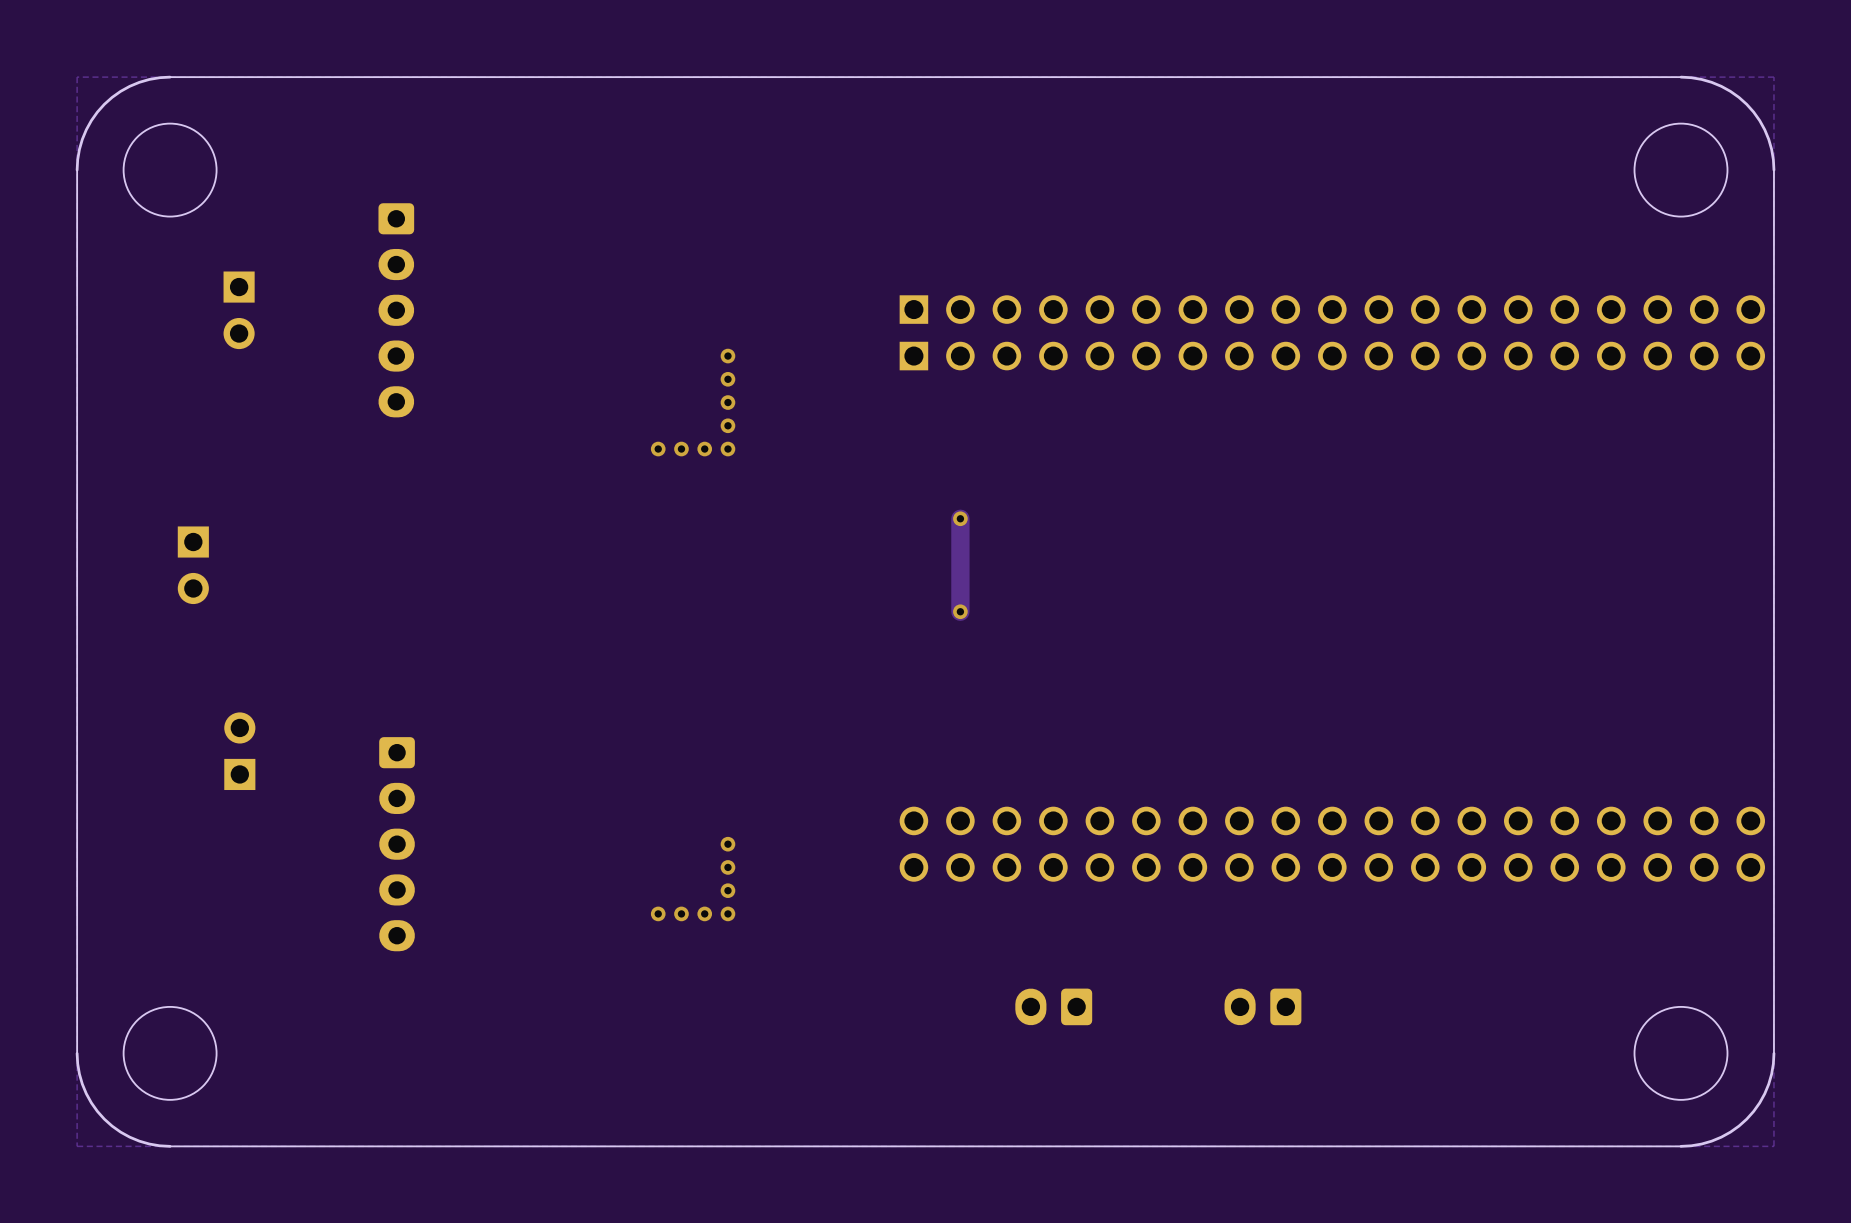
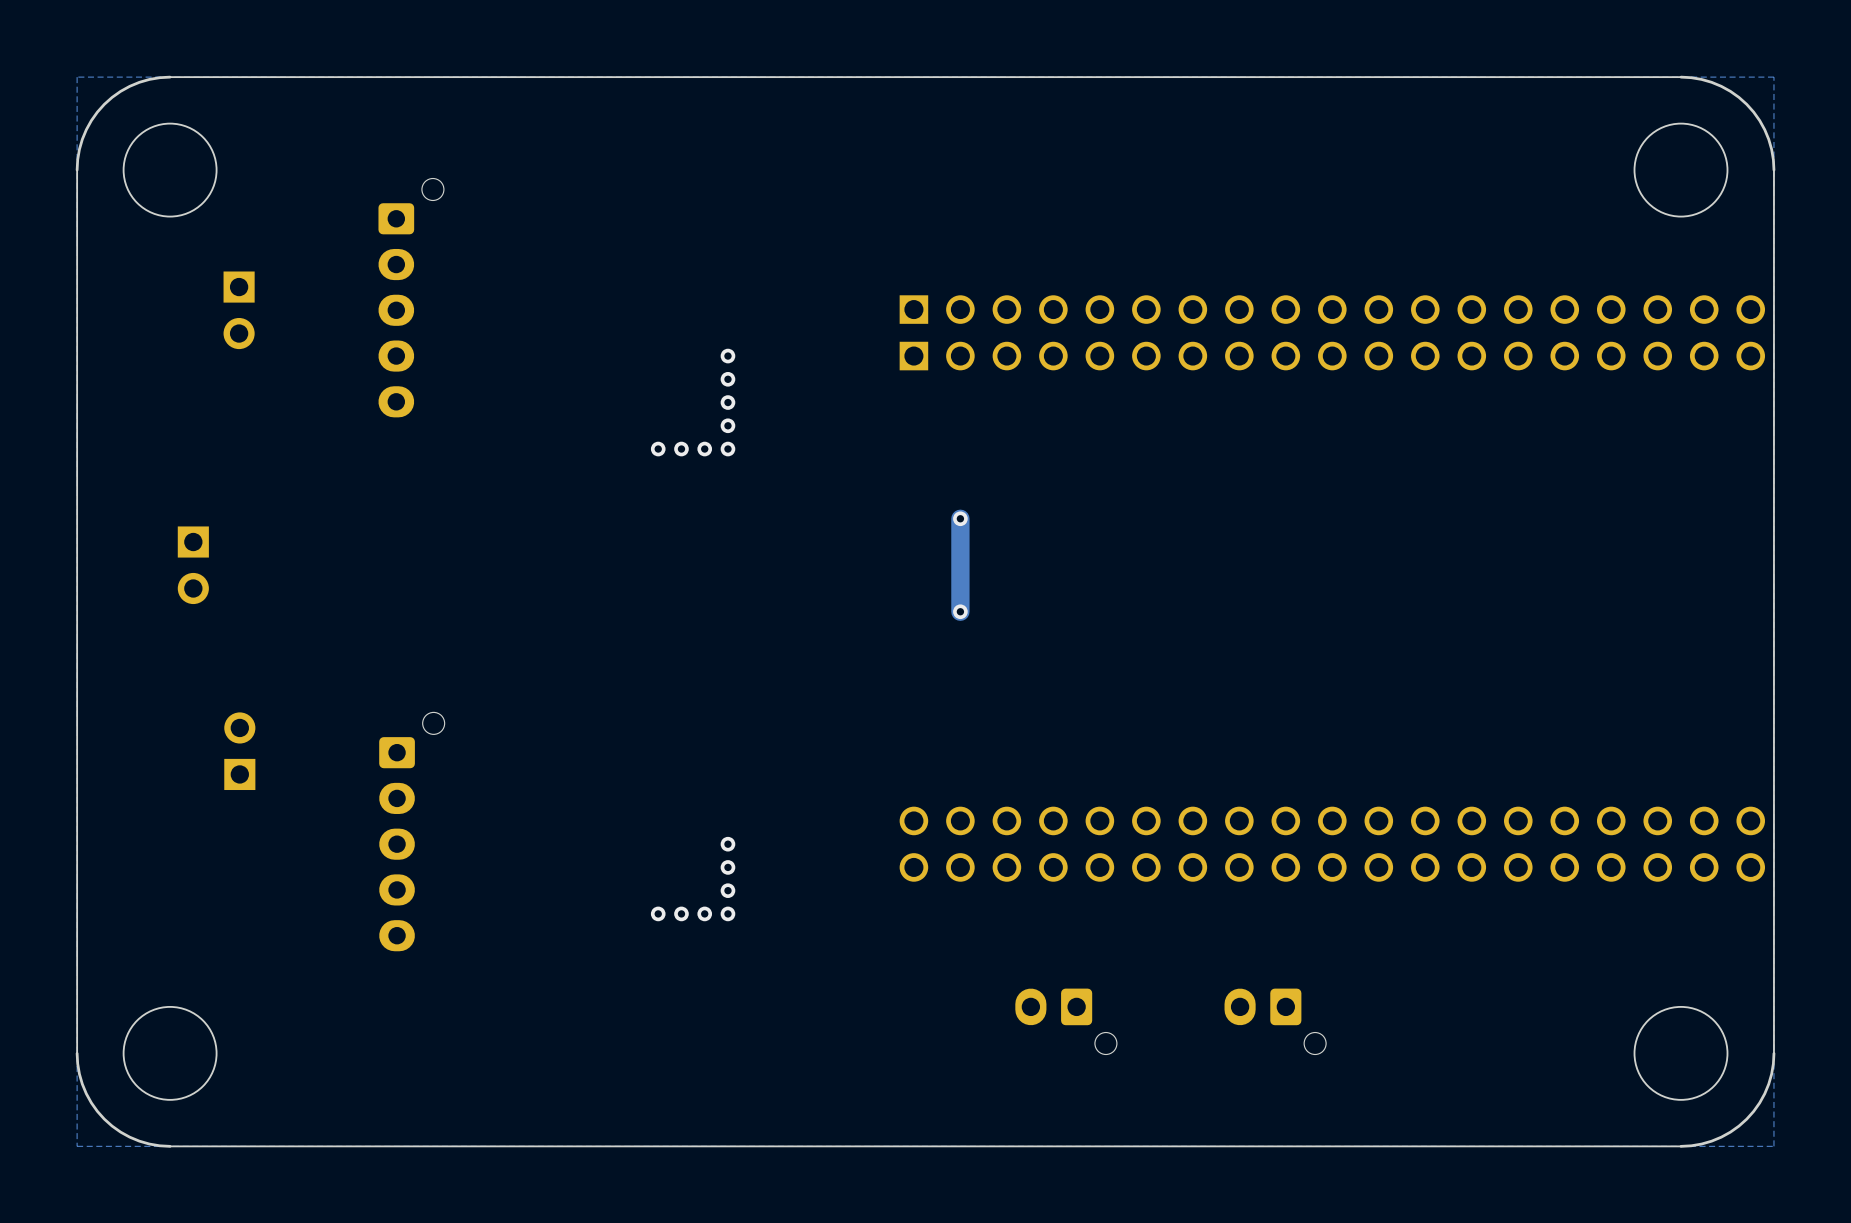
part: none -> (411, 297)
part: none -> (411, 831)
part: none -> (1066, 1021)
part: none -> (1275, 1021)

